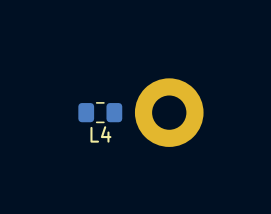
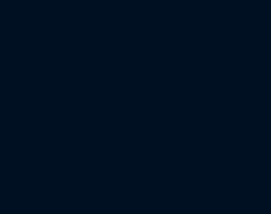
L4: (100, 112) -> none
part: (169, 112) -> none

